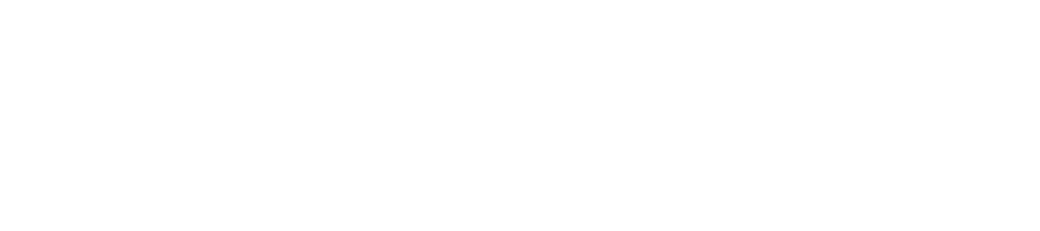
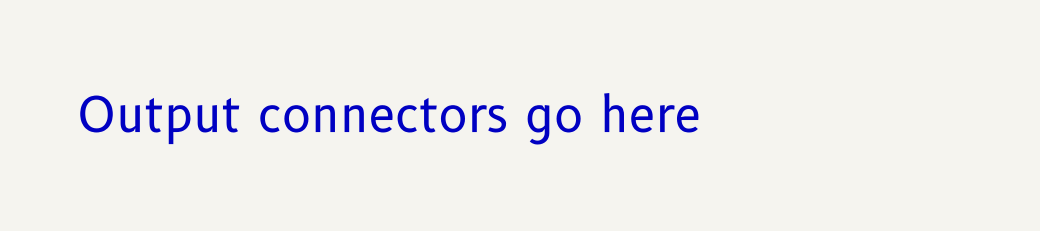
text: none -> Output connectors go here (389, 118)

